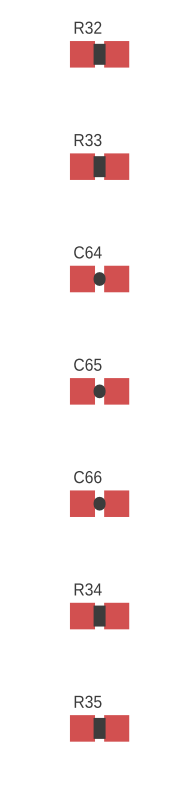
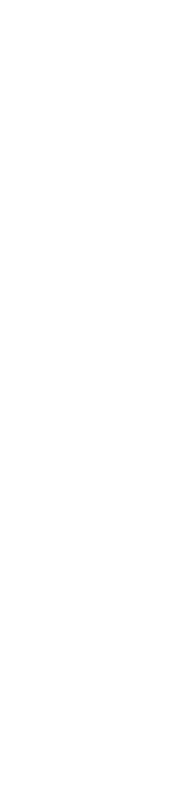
R32: (99, 54) -> none
R33: (99, 166) -> none
C64: (99, 279) -> none
C65: (99, 391) -> none
C66: (99, 503) -> none
R34: (99, 616) -> none
R35: (99, 728) -> none

